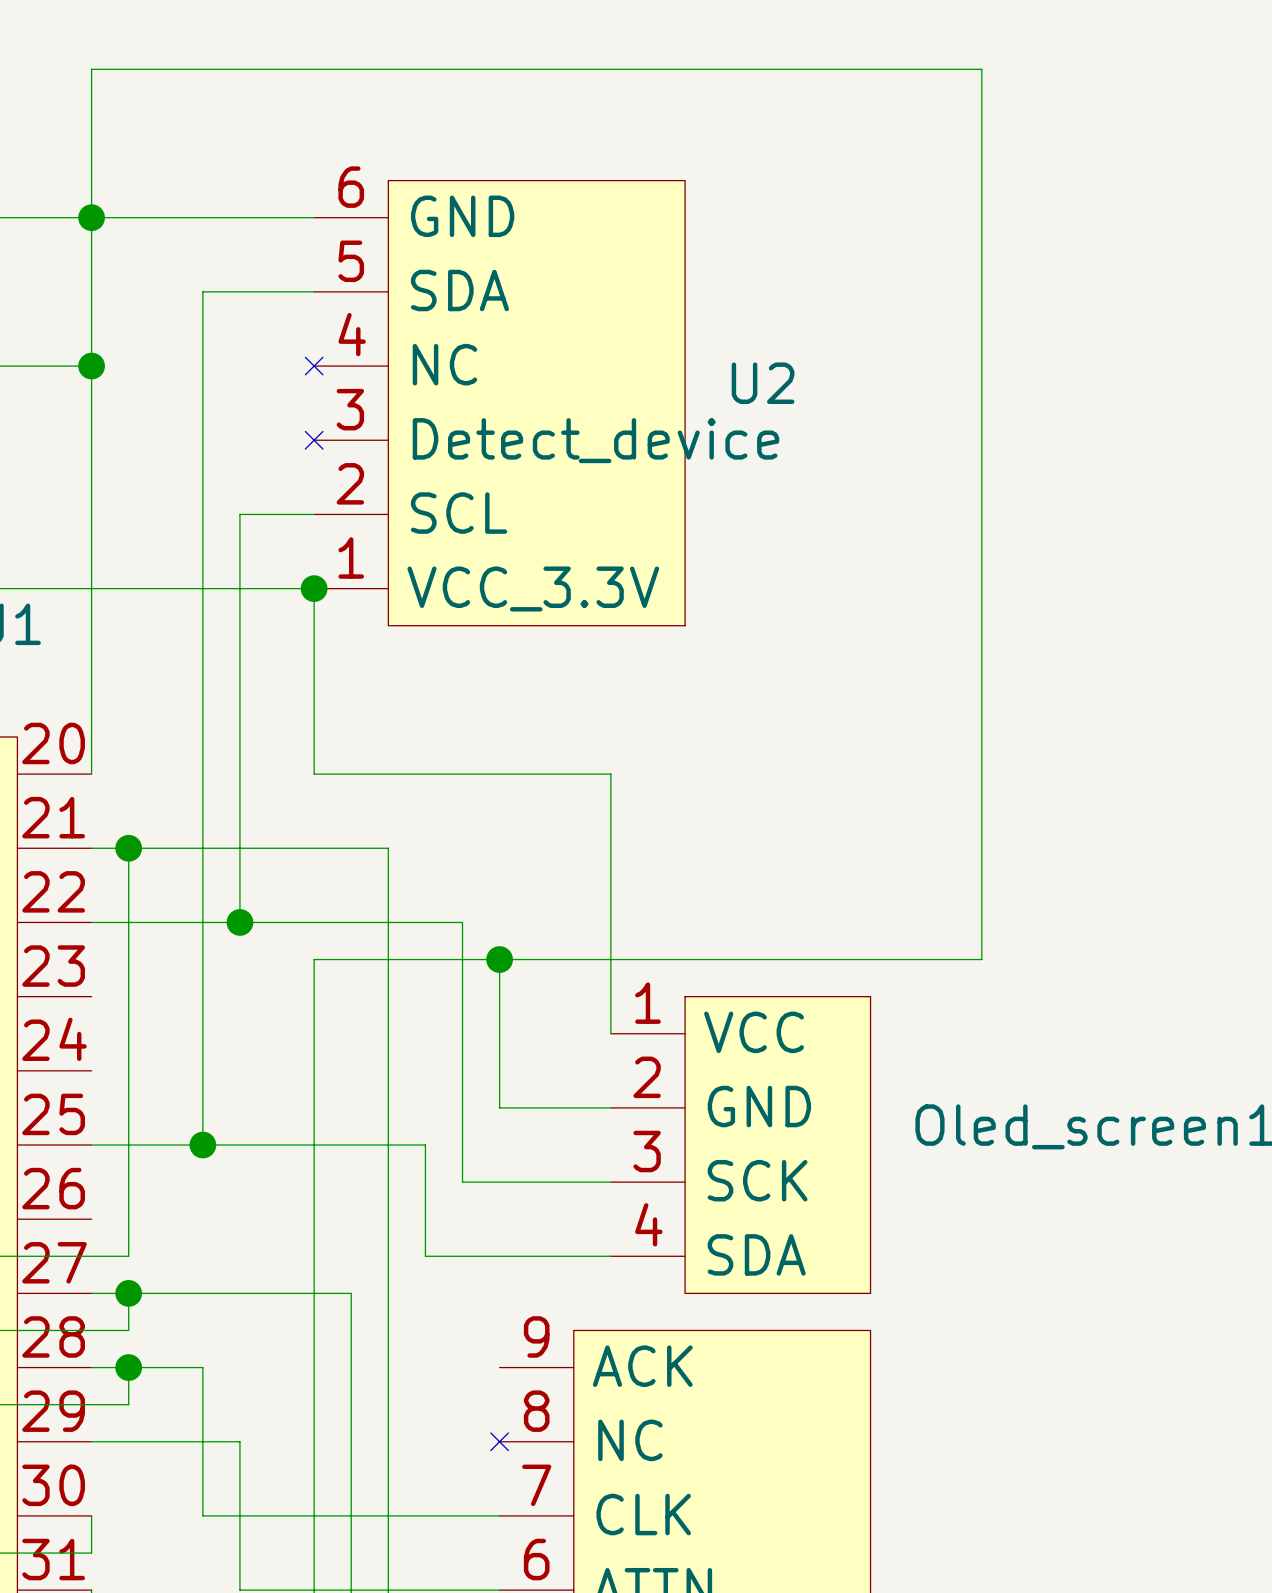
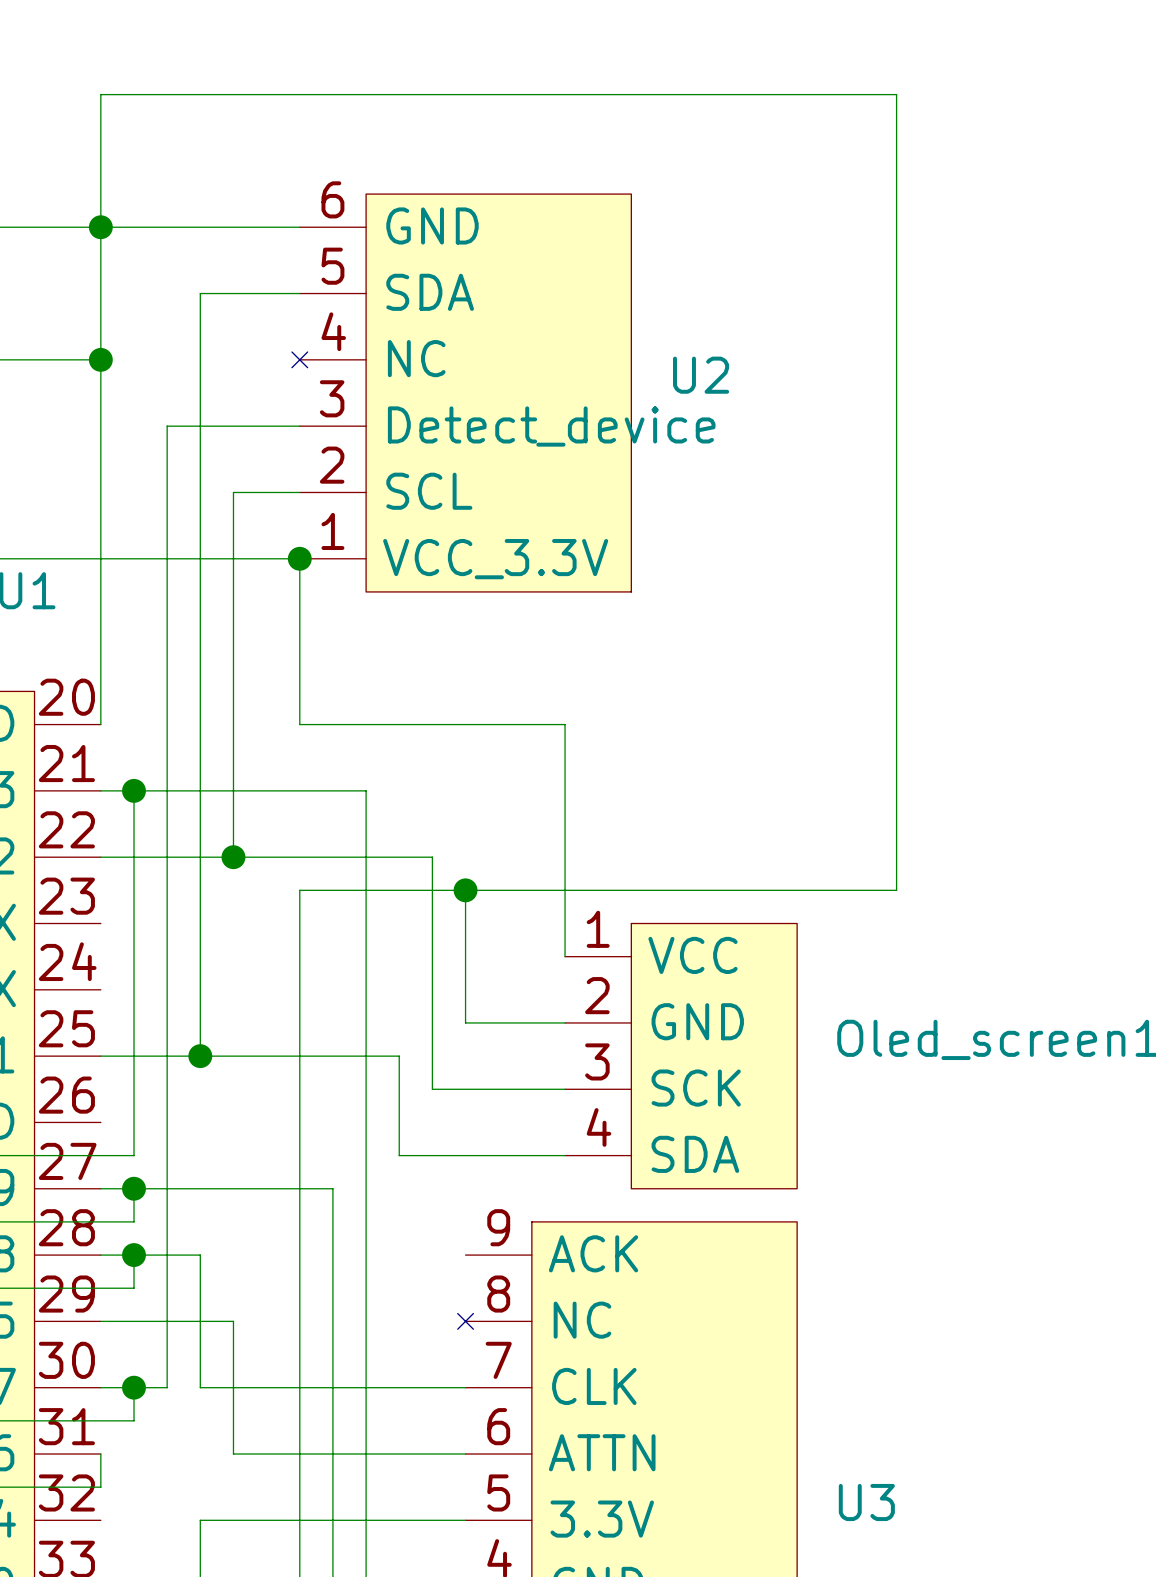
U2 symbol: [305, 180, 686, 626] -> [291, 194, 632, 592]
wire: none -> (299, 426) (167, 426) (167, 1387) (100, 1387)
wire: (91, 1515) (91, 1553) -> (134, 1387) (134, 1420) (100, 1420)
junction: none -> (134, 1387)

